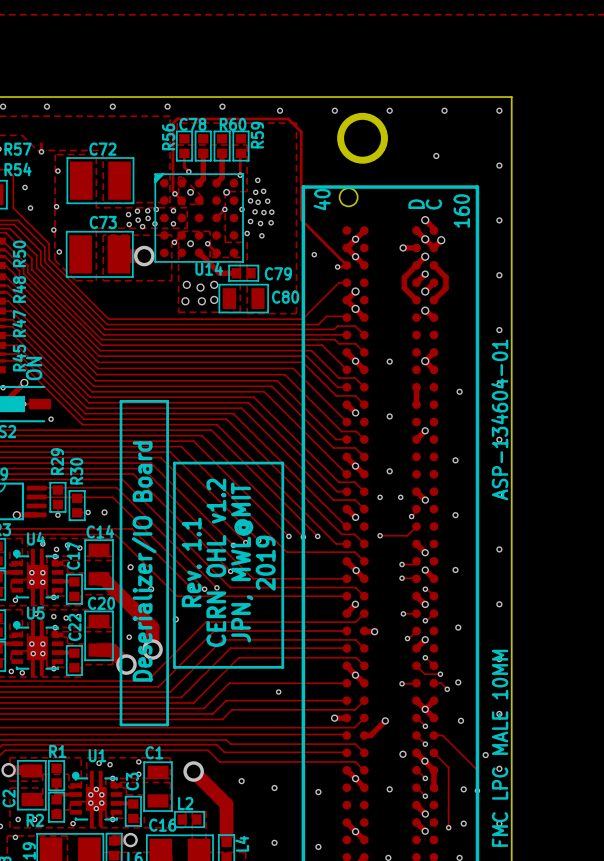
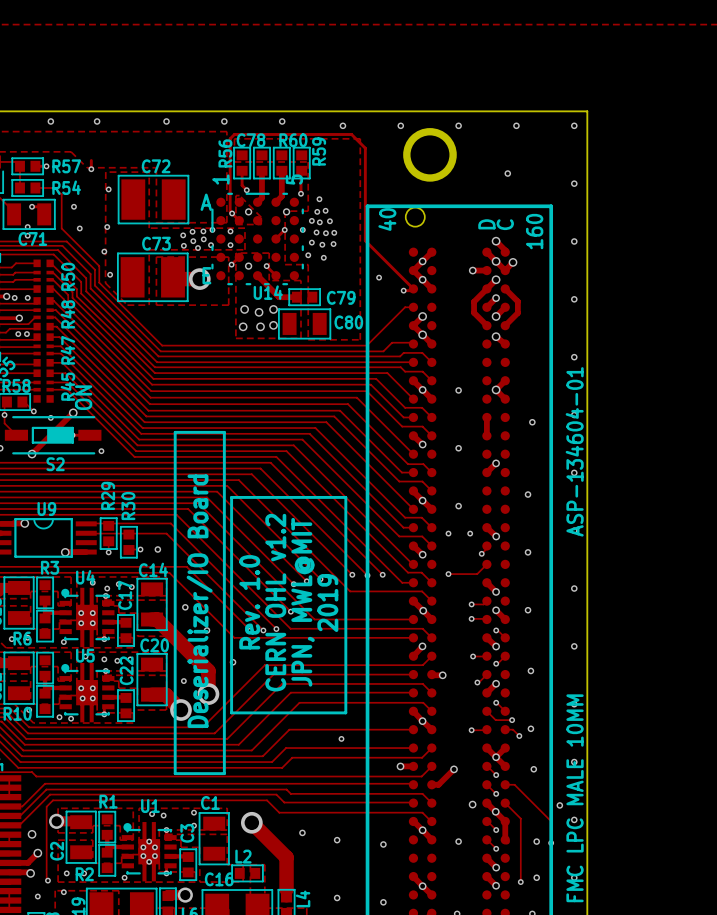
U14 footprint: [154, 173, 244, 263] -> [211, 192, 304, 286]
text: Rev. 1.1 (191, 562) -> Rev. 1.0 (249, 602)

